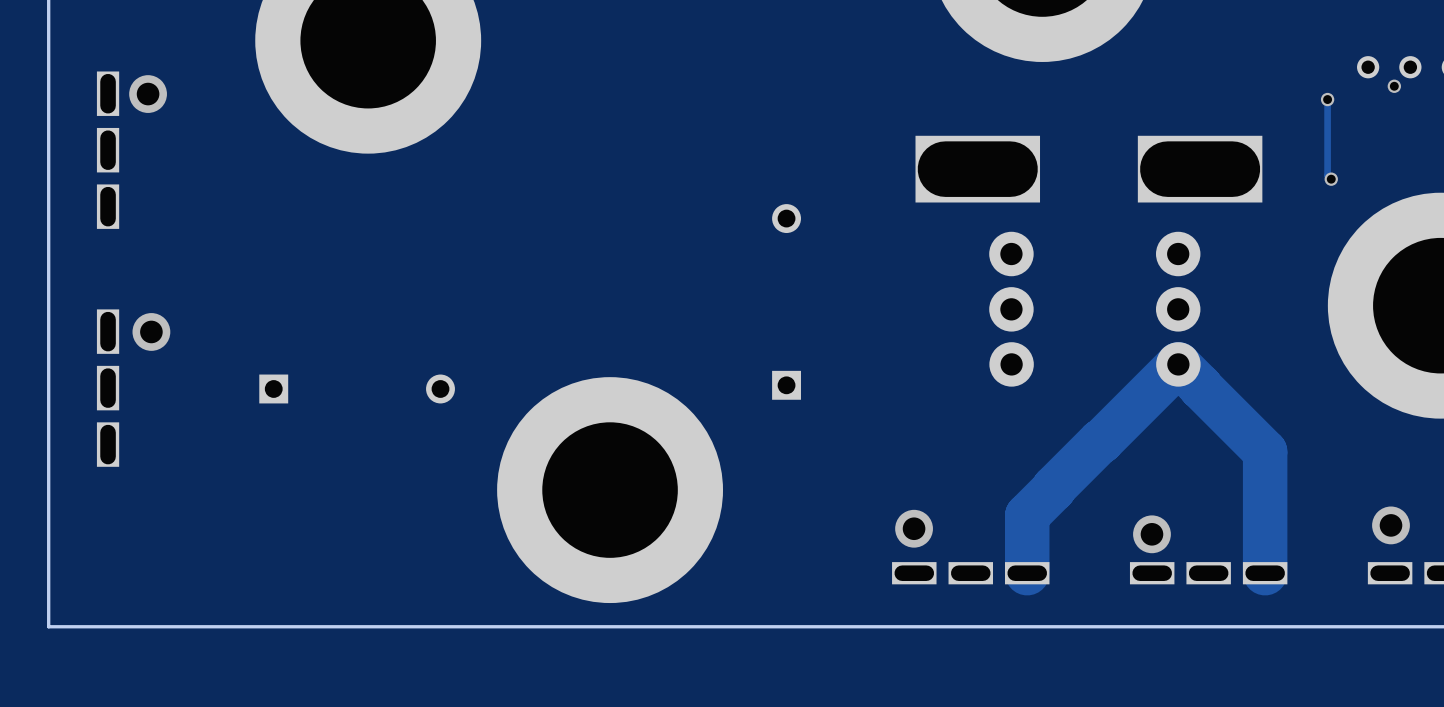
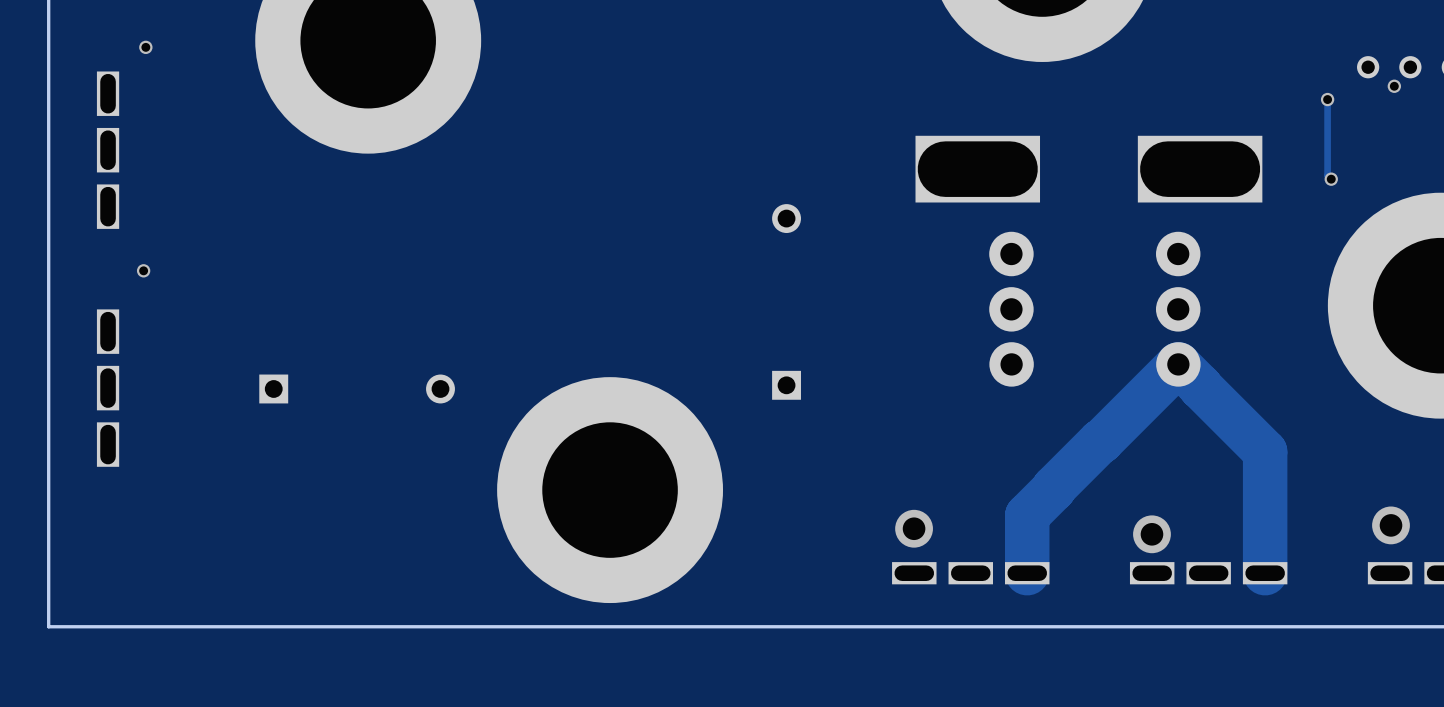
via: none -> (145, 47)
via: (148, 94) -> none
via: none -> (143, 270)
via: (151, 331) -> none

